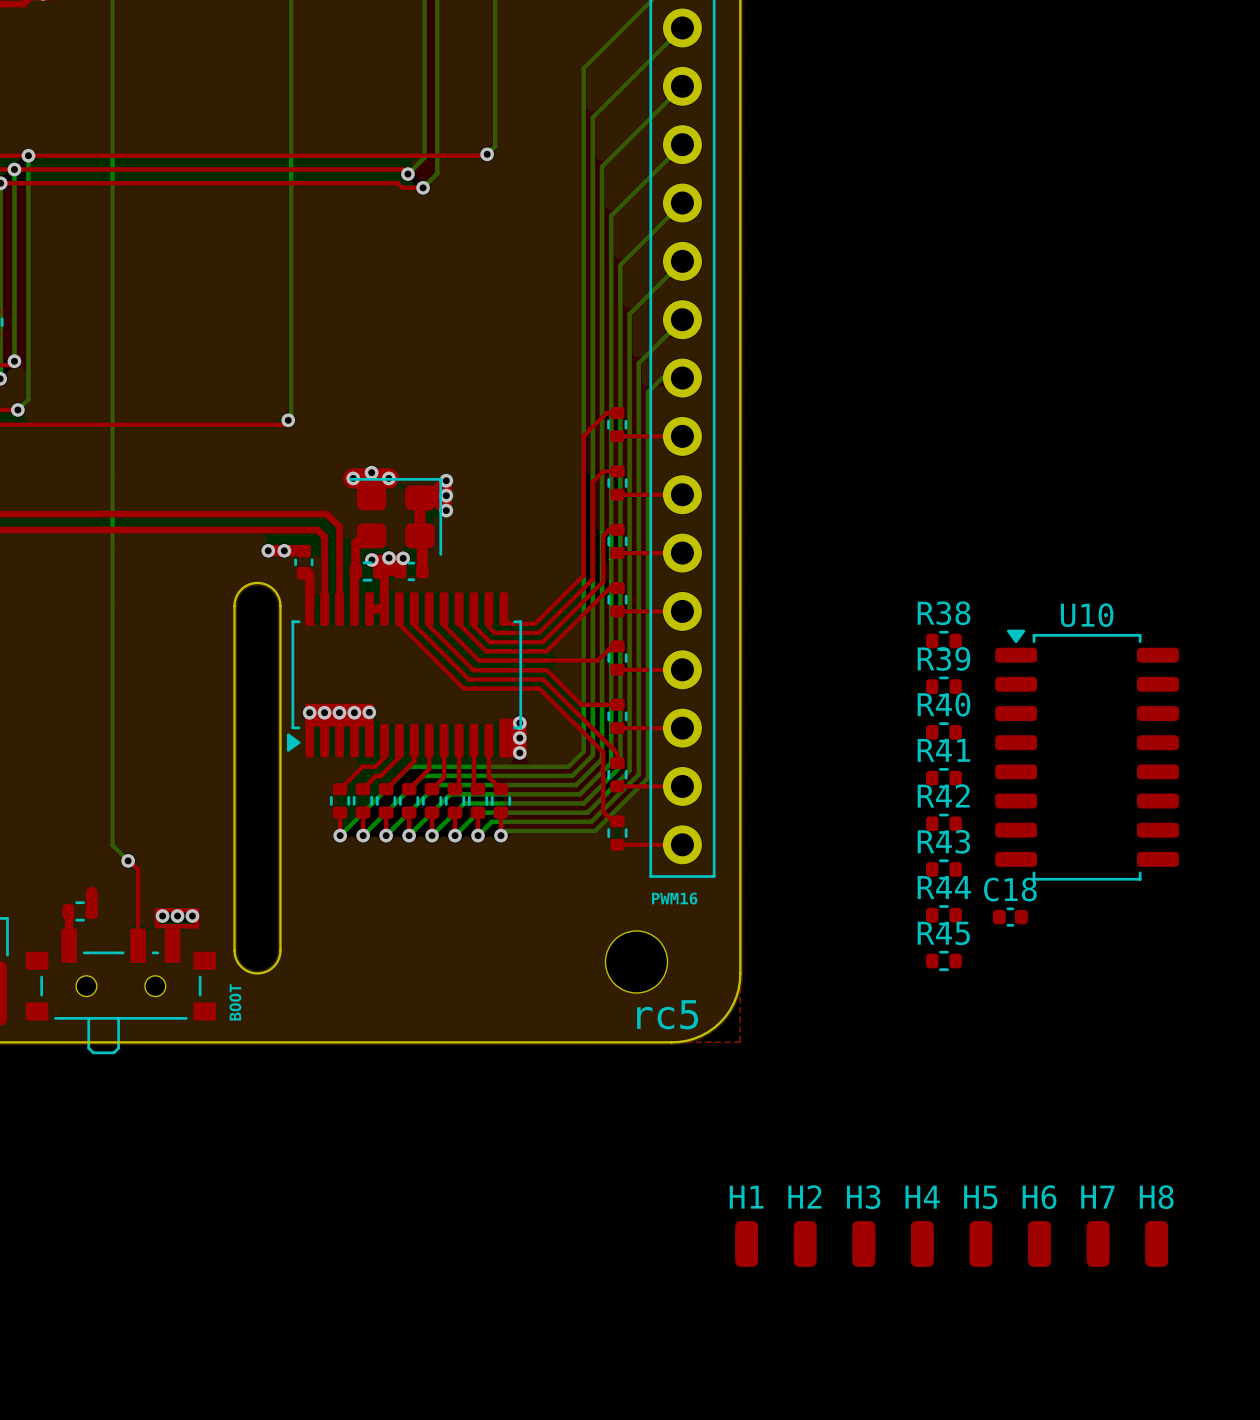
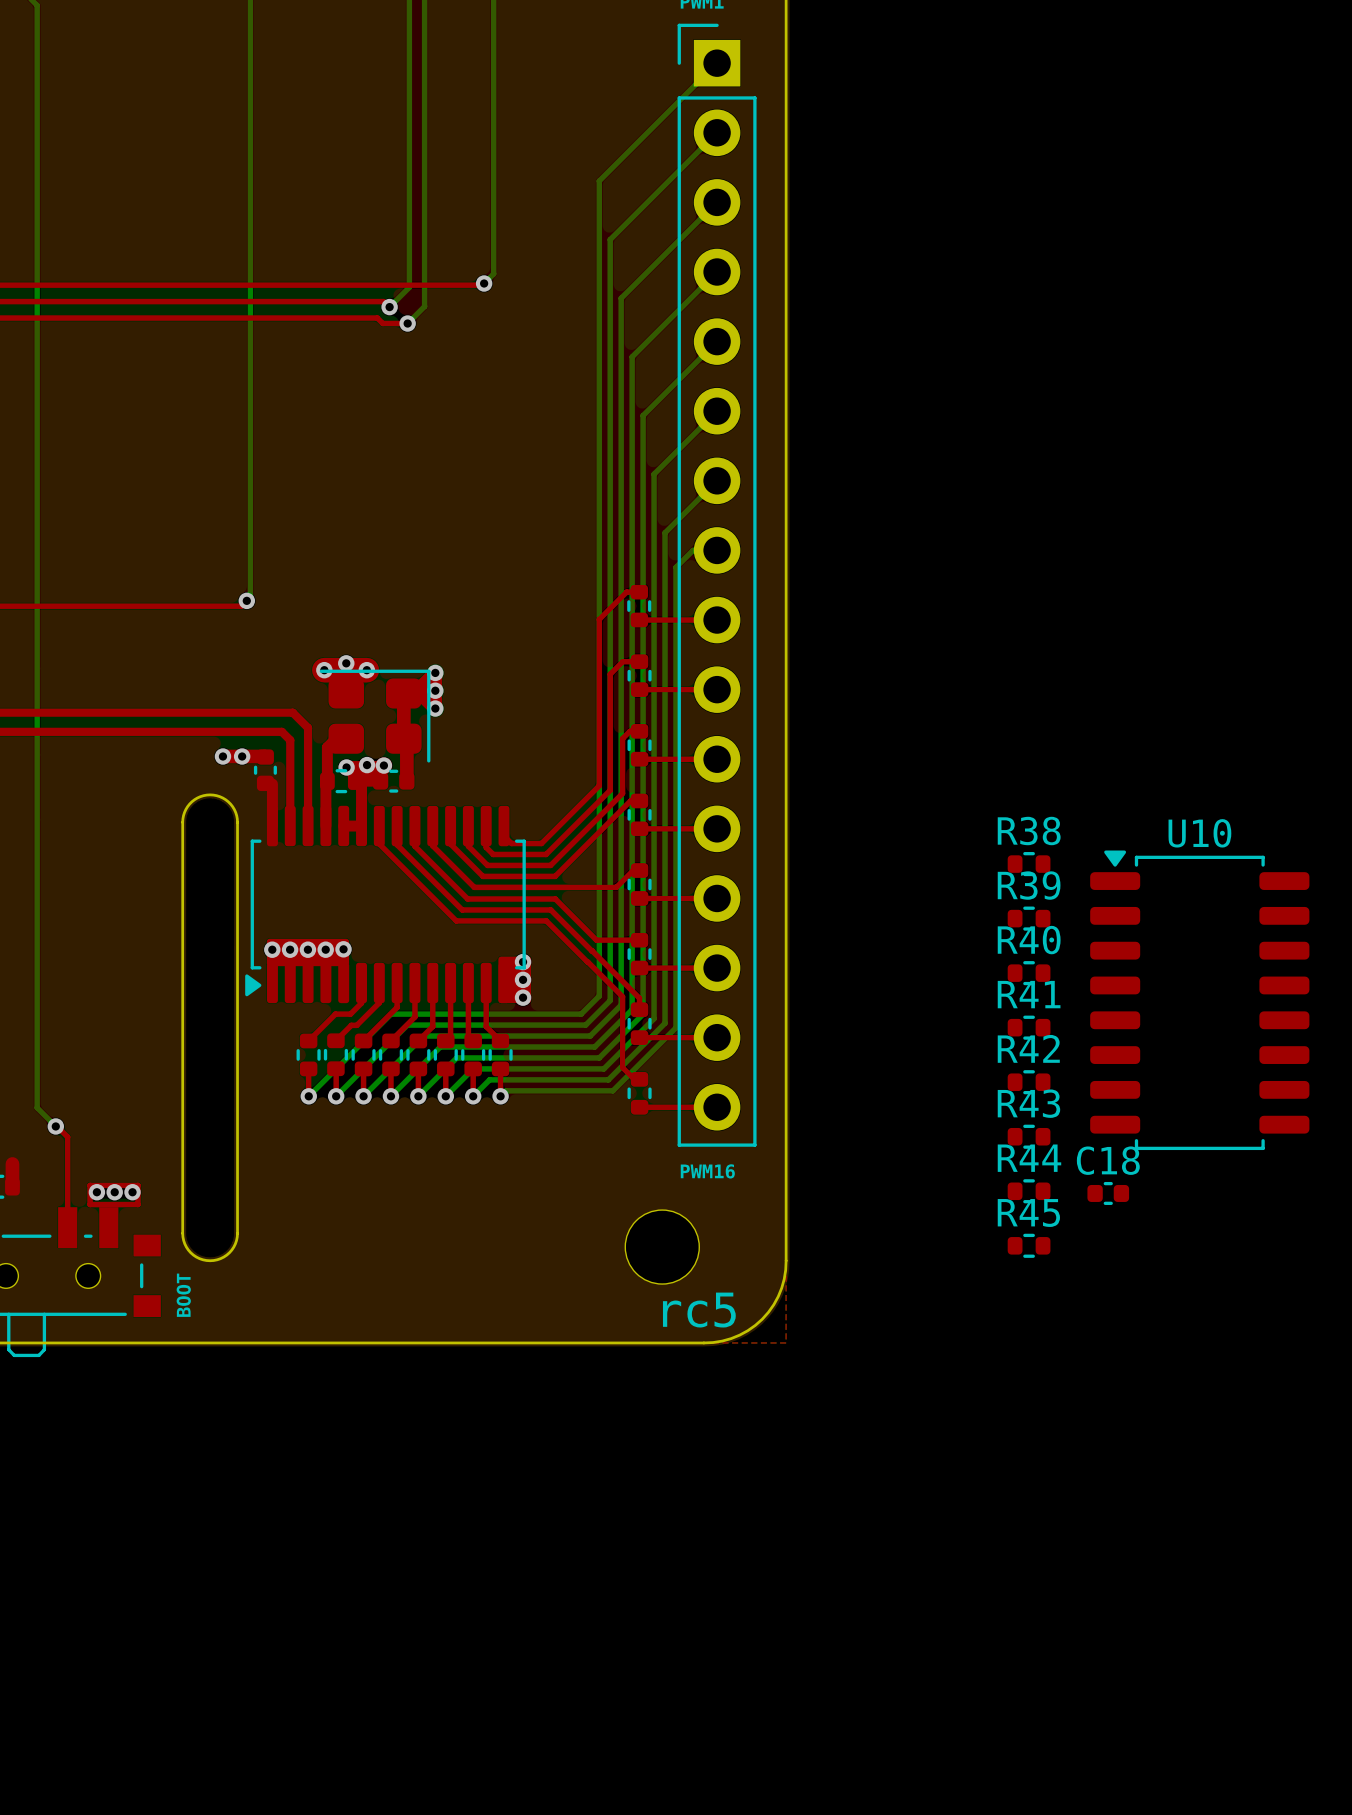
H1: (746, 1243) -> none
H2: (805, 1243) -> none
H3: (863, 1243) -> none
H4: (922, 1243) -> none
H5: (980, 1243) -> none
H6: (1039, 1243) -> none
H7: (1098, 1243) -> none
H8: (1156, 1243) -> none

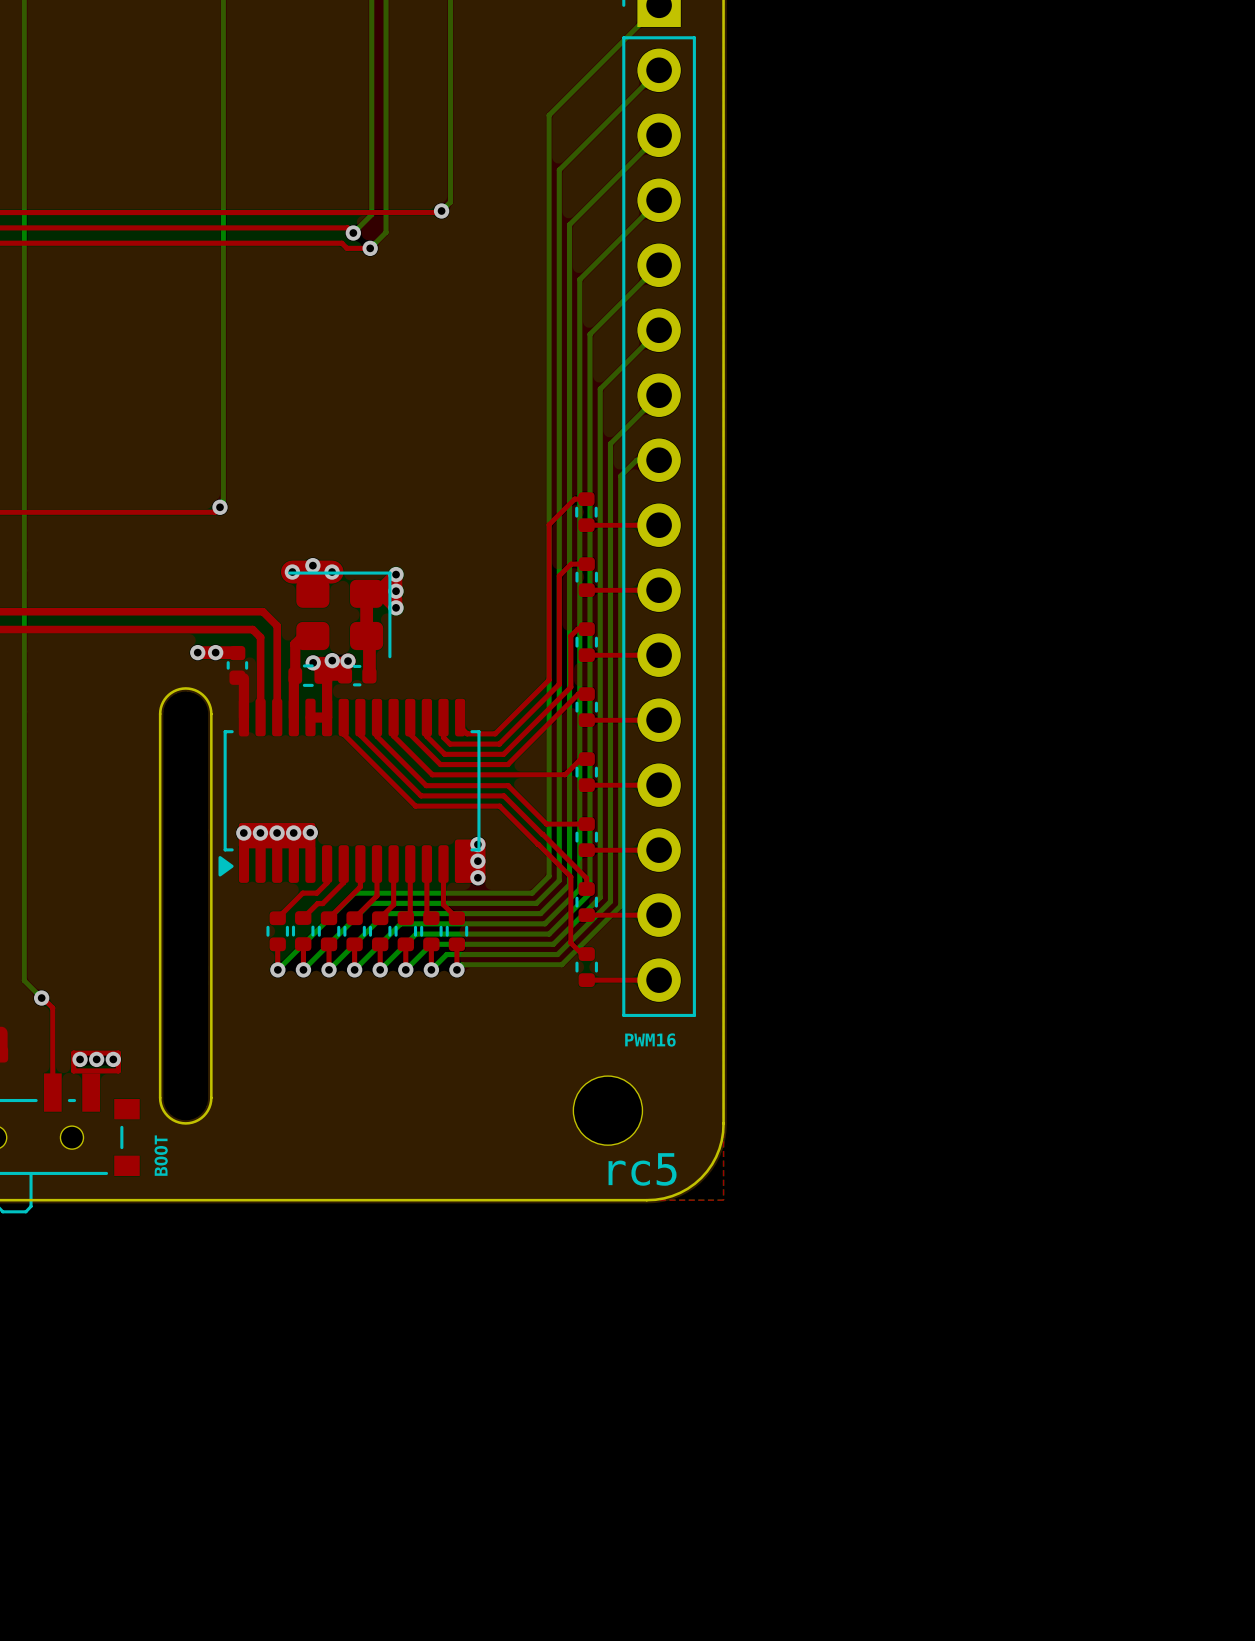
R38: (1029, 864) -> none
R39: (1029, 918) -> none
R40: (1029, 973) -> none
U10: (1199, 1000) -> none
R41: (1029, 1027) -> none
R42: (1029, 1082) -> none
R43: (1029, 1136) -> none
R44: (1029, 1191) -> none
C18: (1108, 1193) -> none
R45: (1029, 1245) -> none

